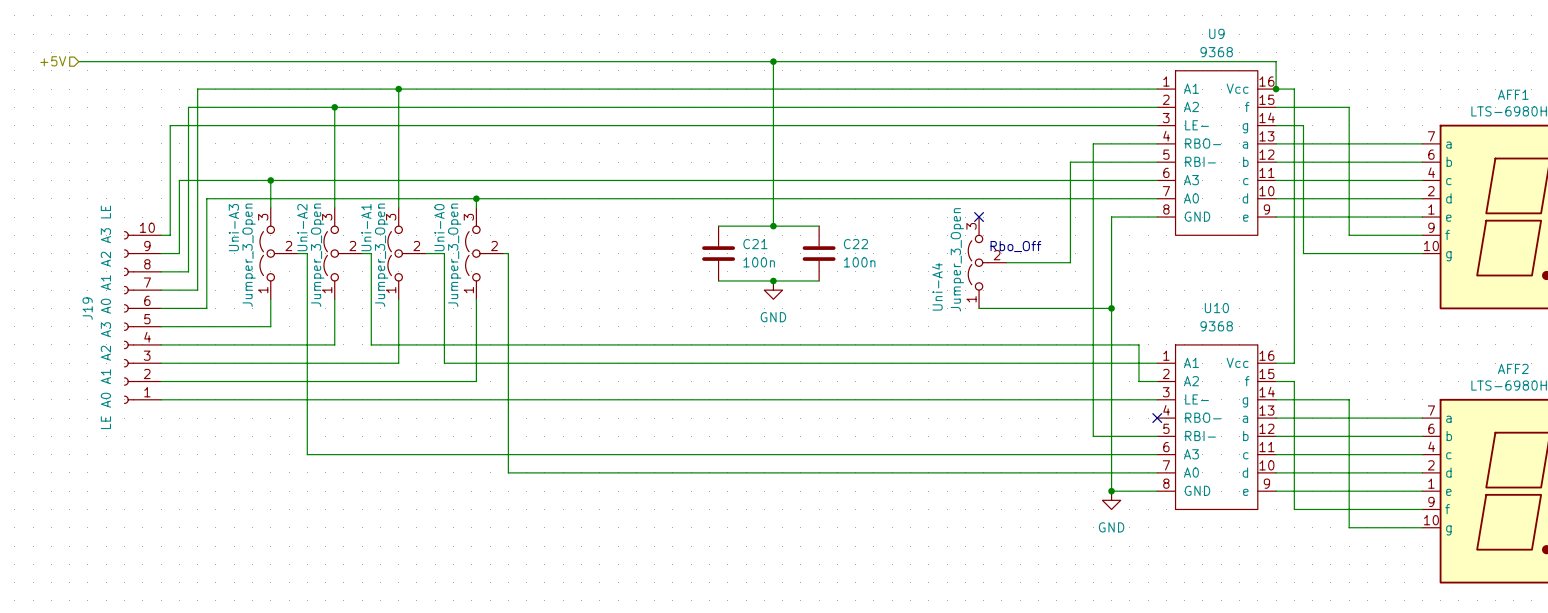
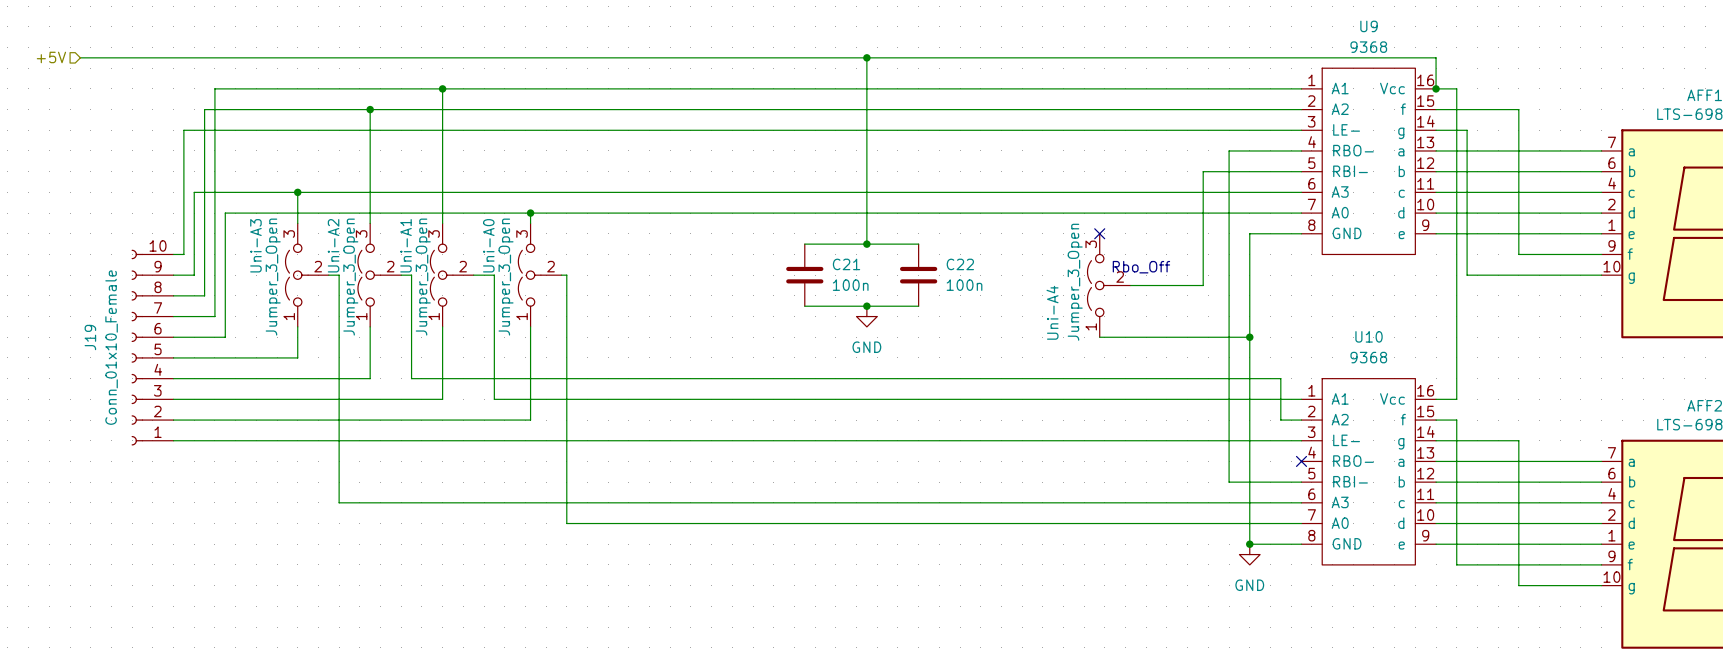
J19 value: LE A0 A1 A2 A3 A0 A1 A2 A3 LE (105, 317) -> Conn_01x10_Female (111, 347)

